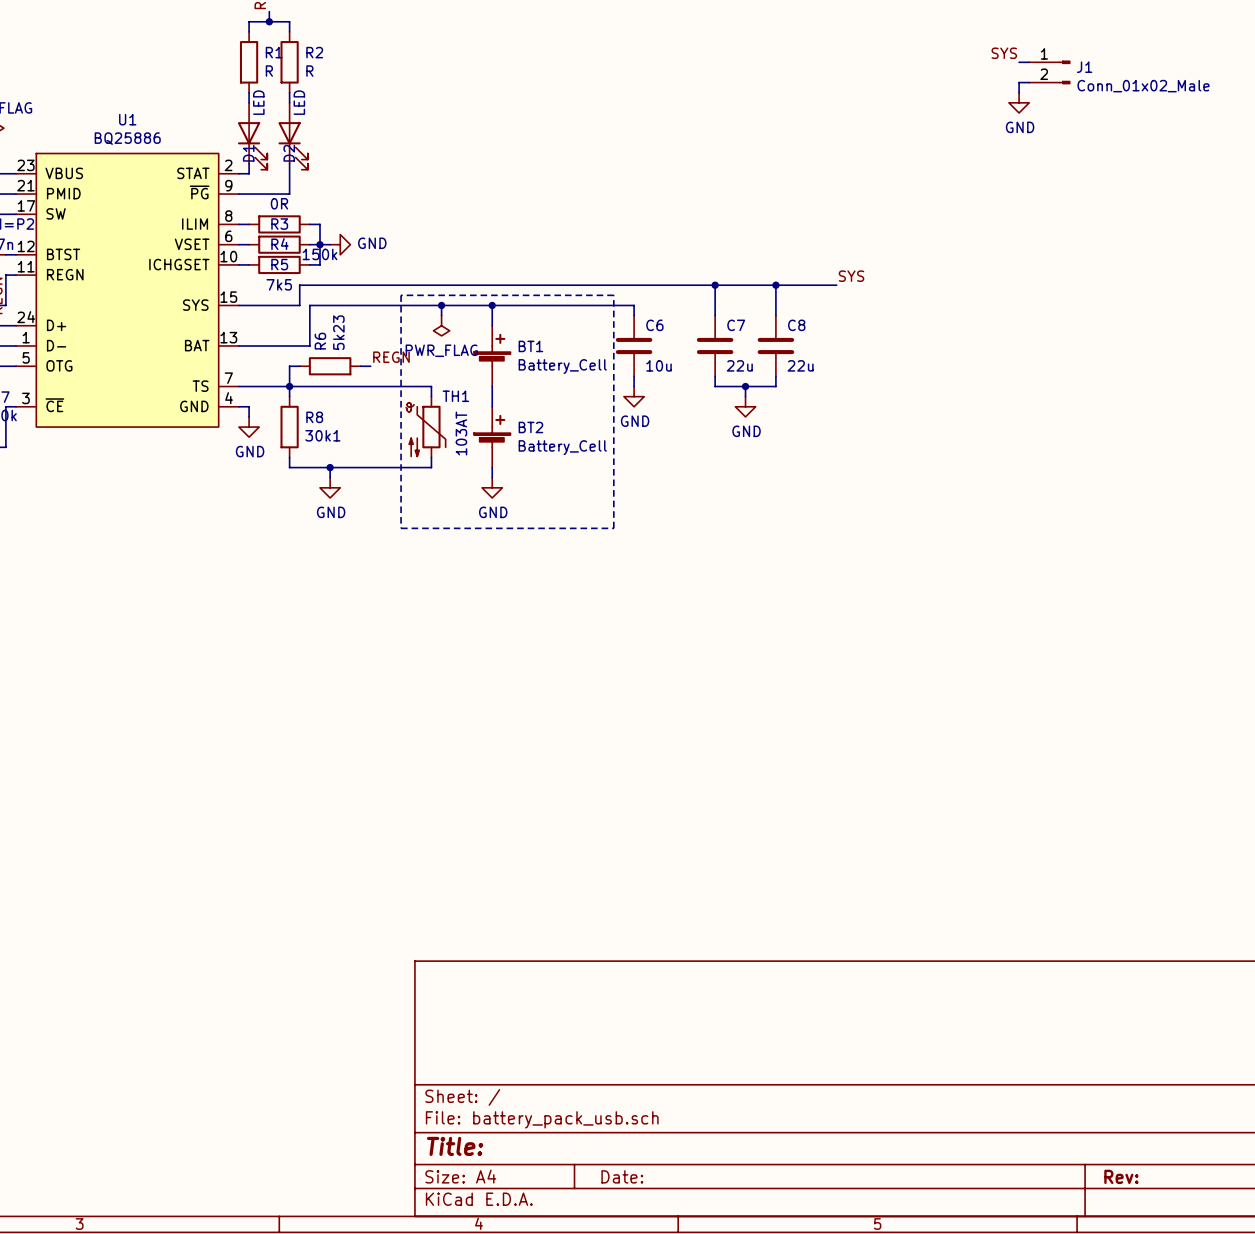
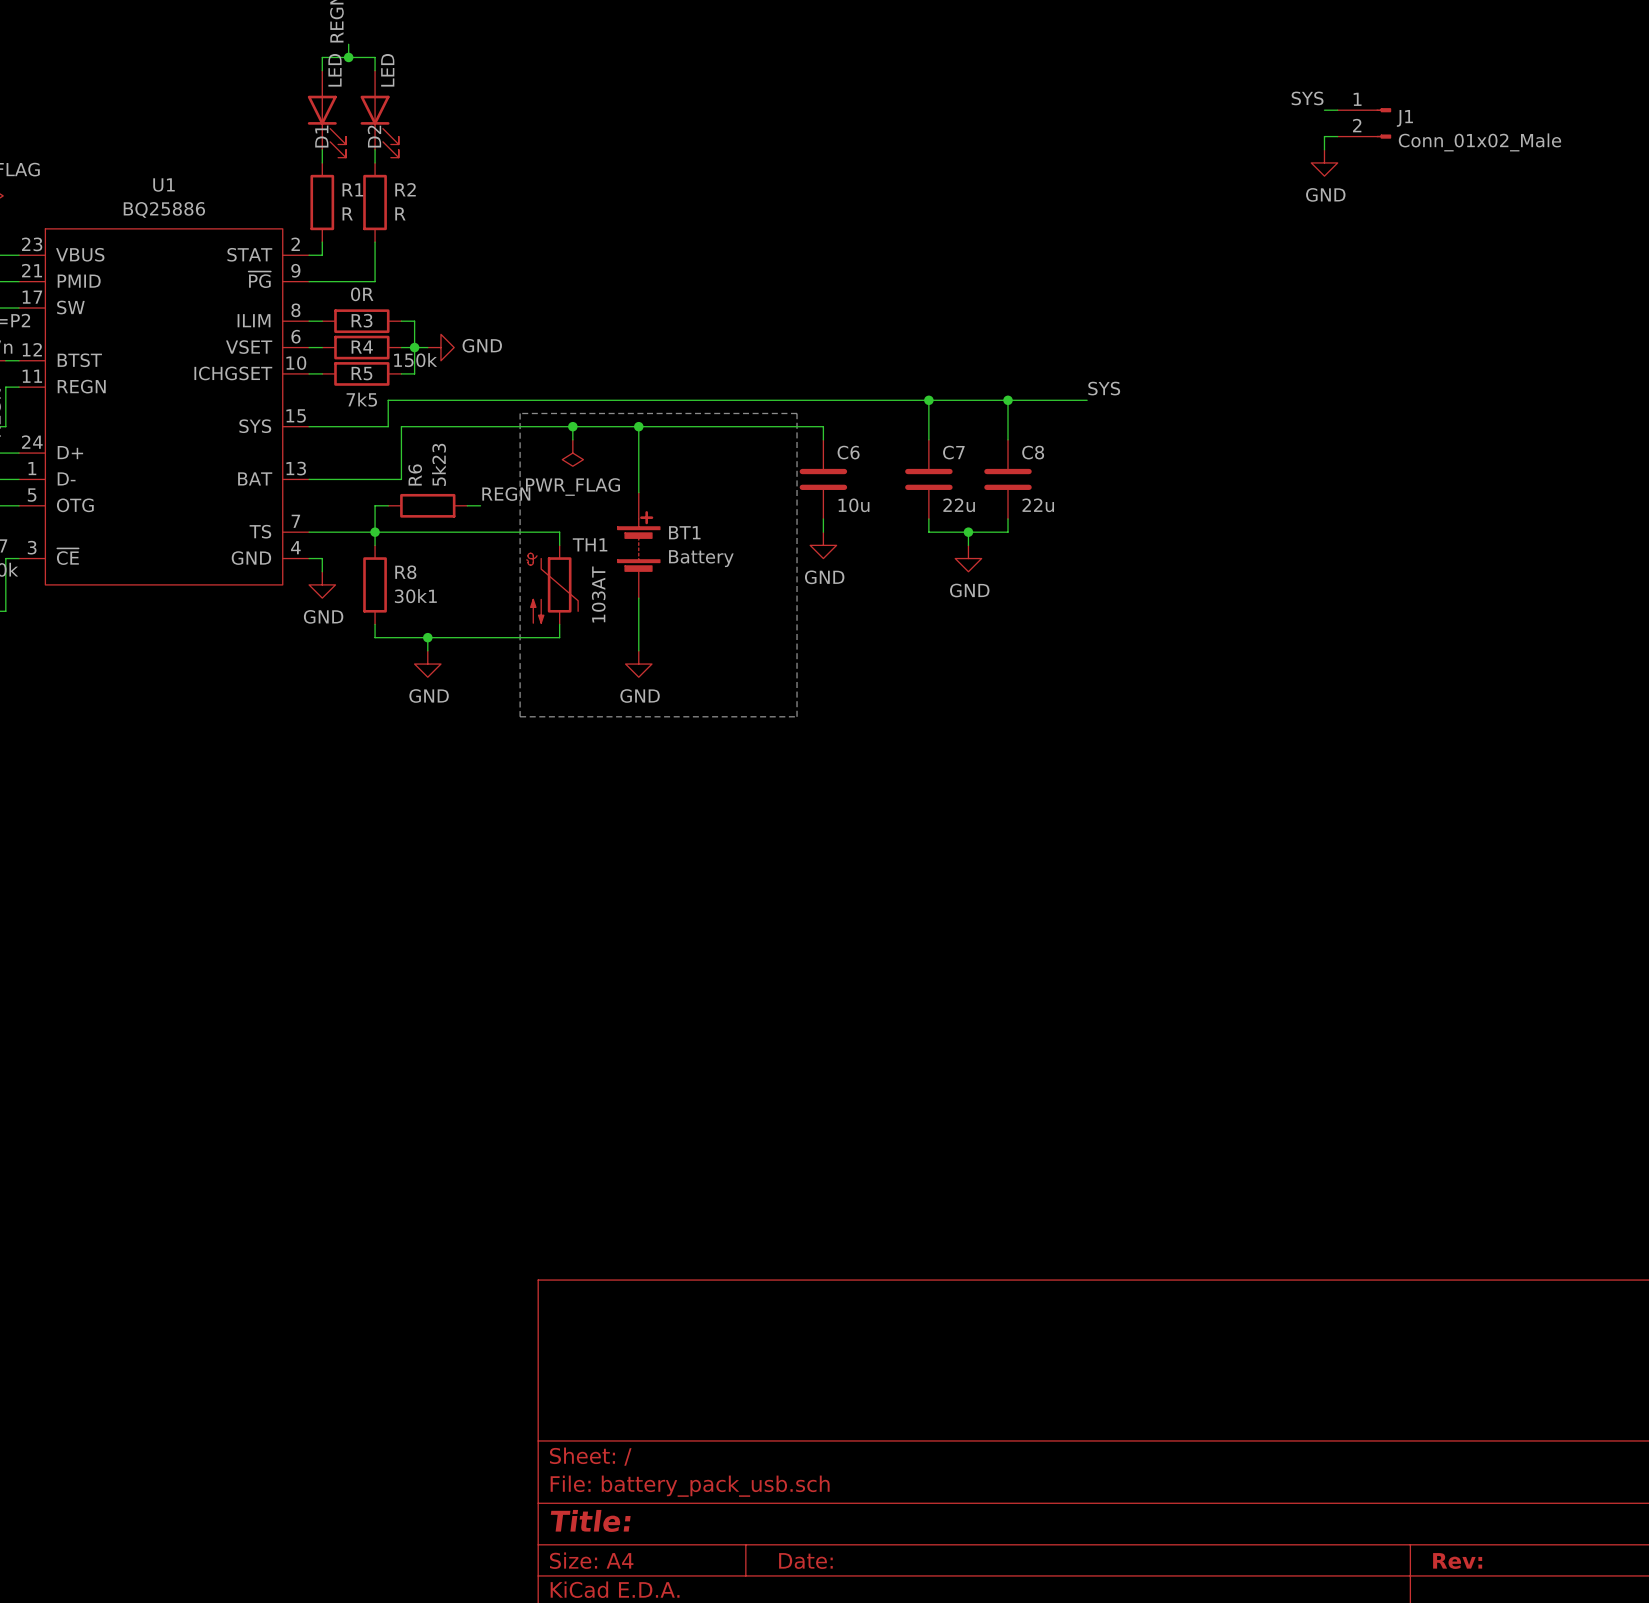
R1 position: (249, 62) -> (322, 202)
R2 position: (289, 62) -> (375, 202)
D1 position: (252, 136) -> (326, 114)
D2 position: (293, 136) -> (379, 114)
BT1 symbol: [473, 325, 511, 387] -> [617, 492, 660, 599]
BT1 value: Battery_Cell (562, 366) -> Battery (701, 558)
BT2: Battery_Cell (492, 437) -> none

